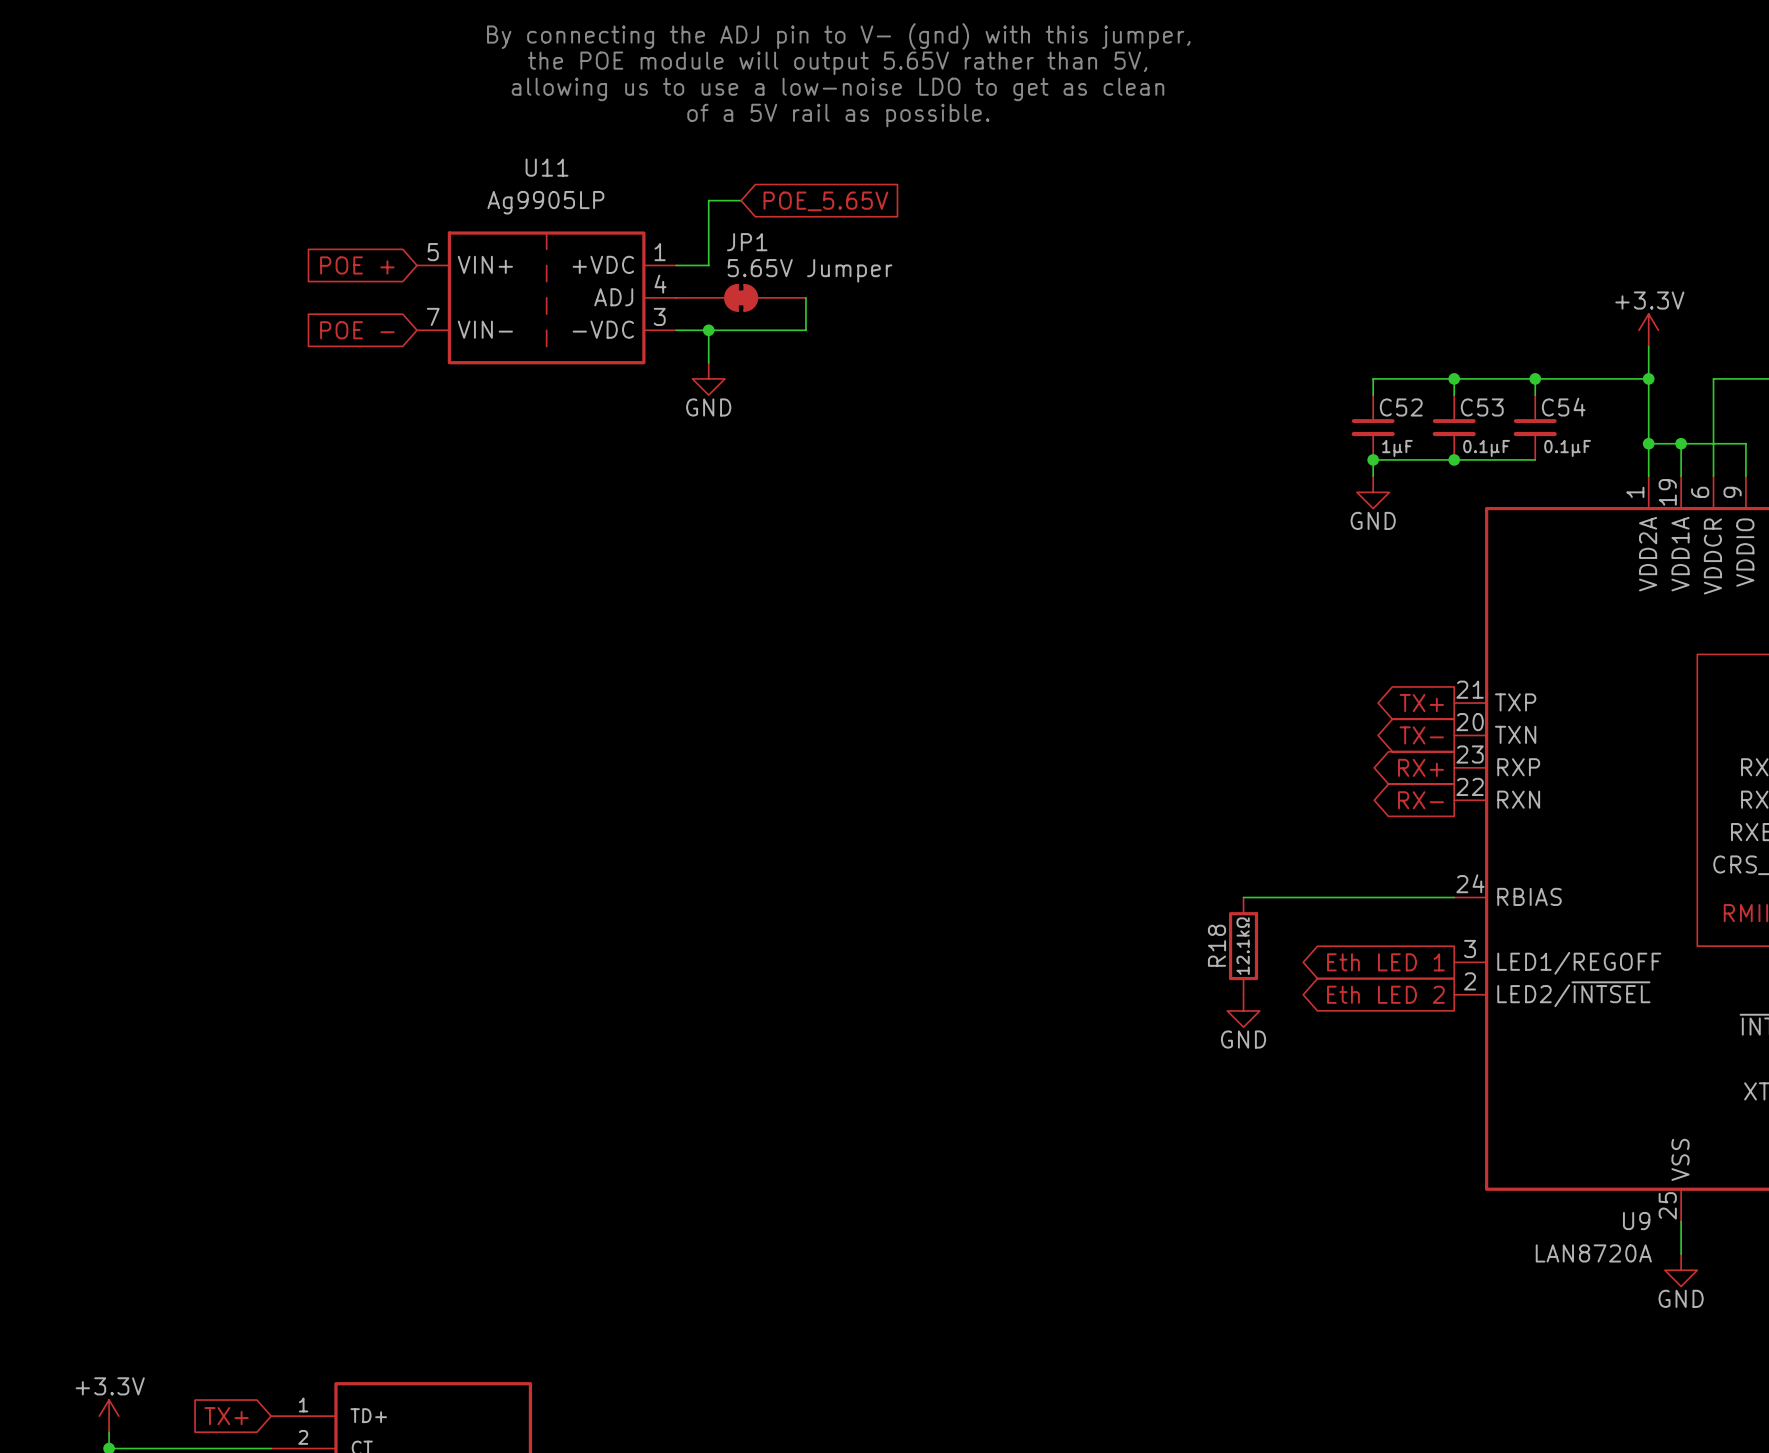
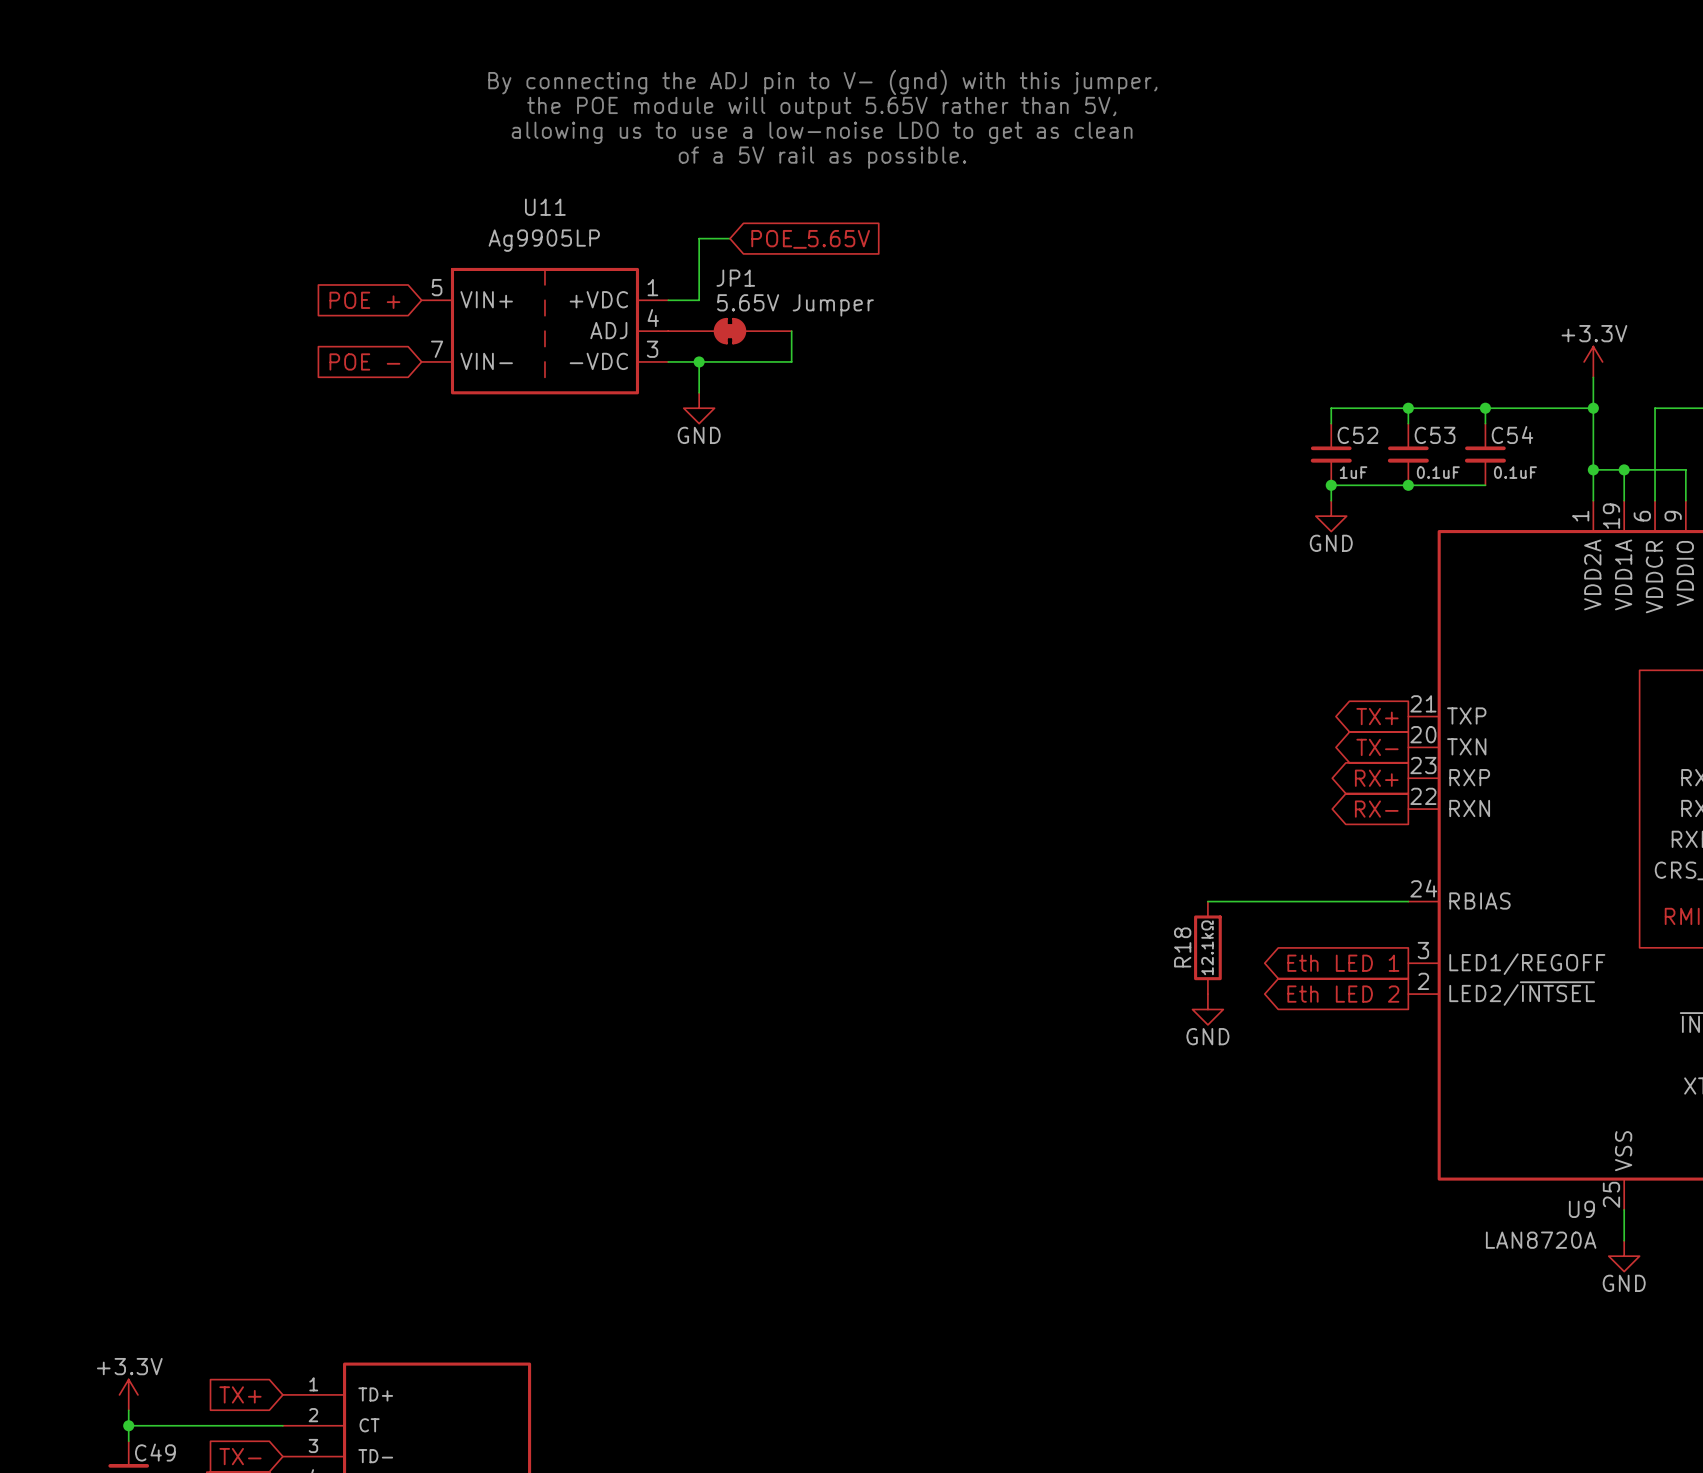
C52 value: 1µF (1397, 448) -> 1uF (1353, 472)
C53 value: 0.1µF (1486, 448) -> 0.1uF (1438, 472)
C54 value: 0.1µF (1567, 448) -> 0.1uF (1515, 472)

